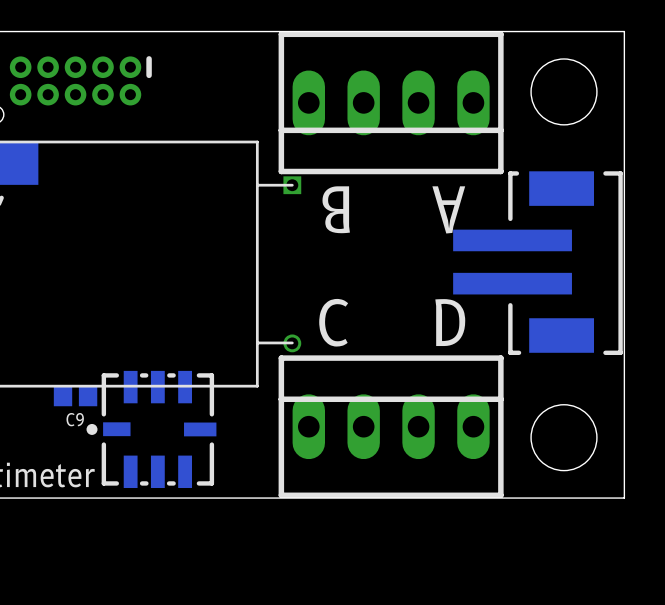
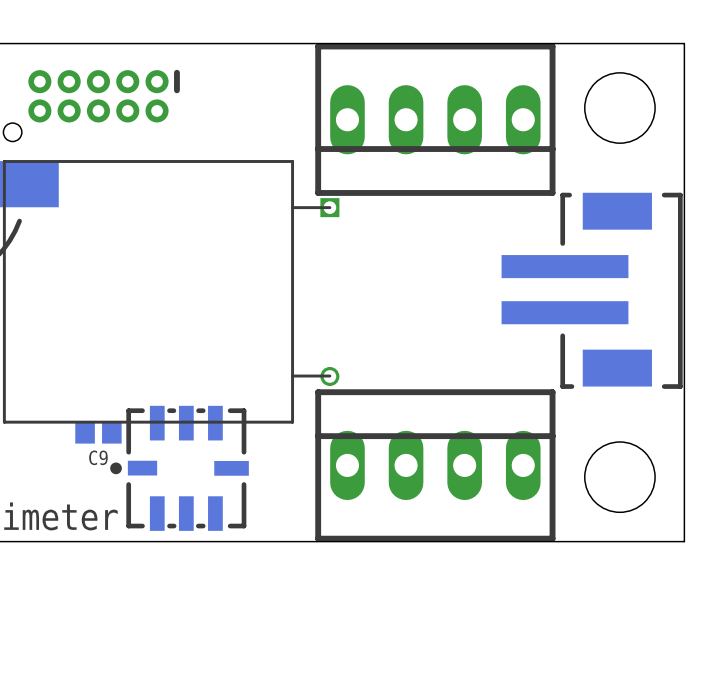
text: B (336, 209) -> none
text: A (448, 209) -> none
text: C (333, 322) -> none
text: D (450, 322) -> none

